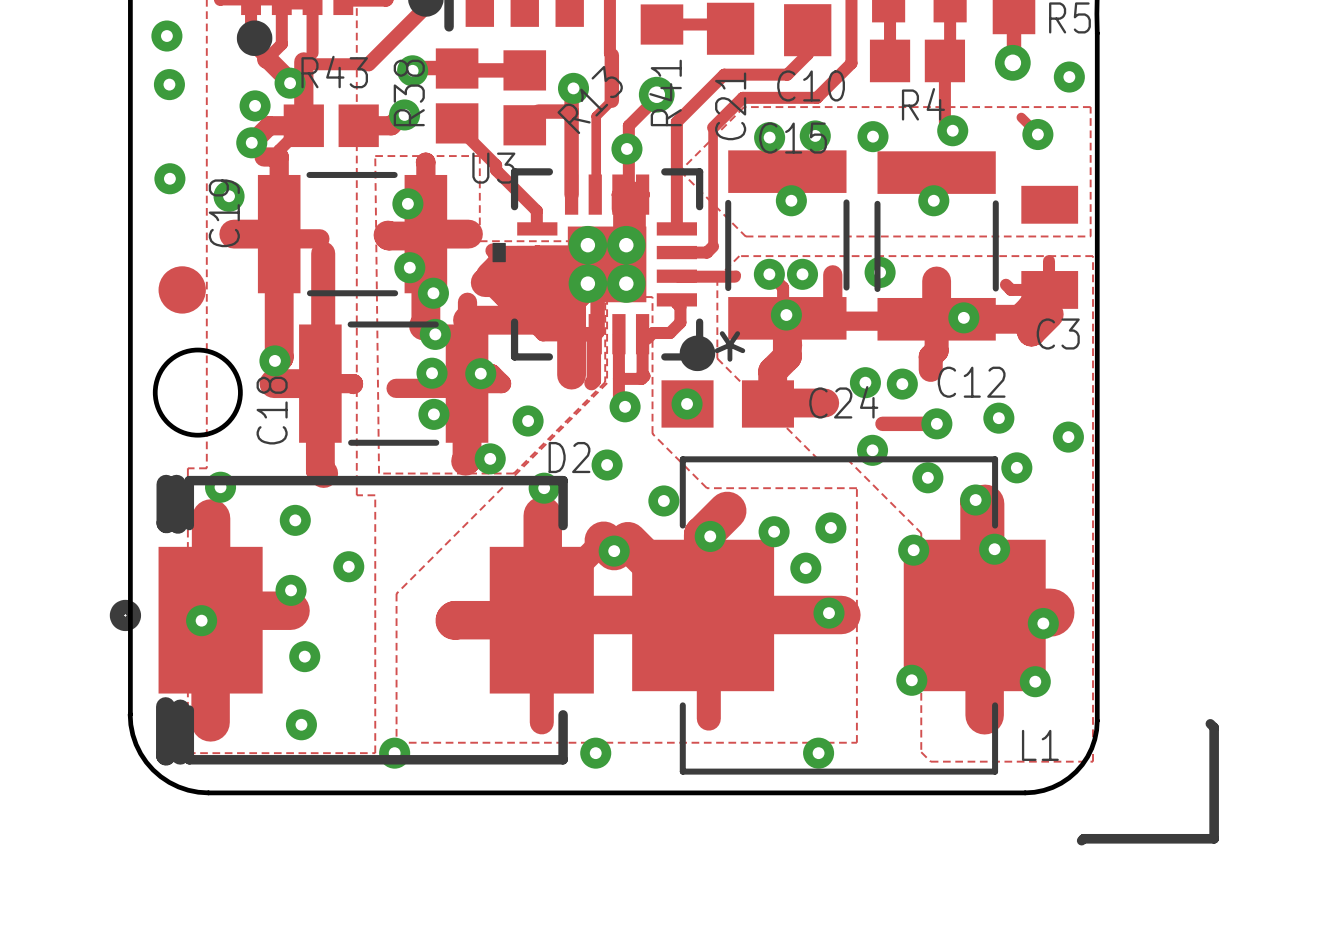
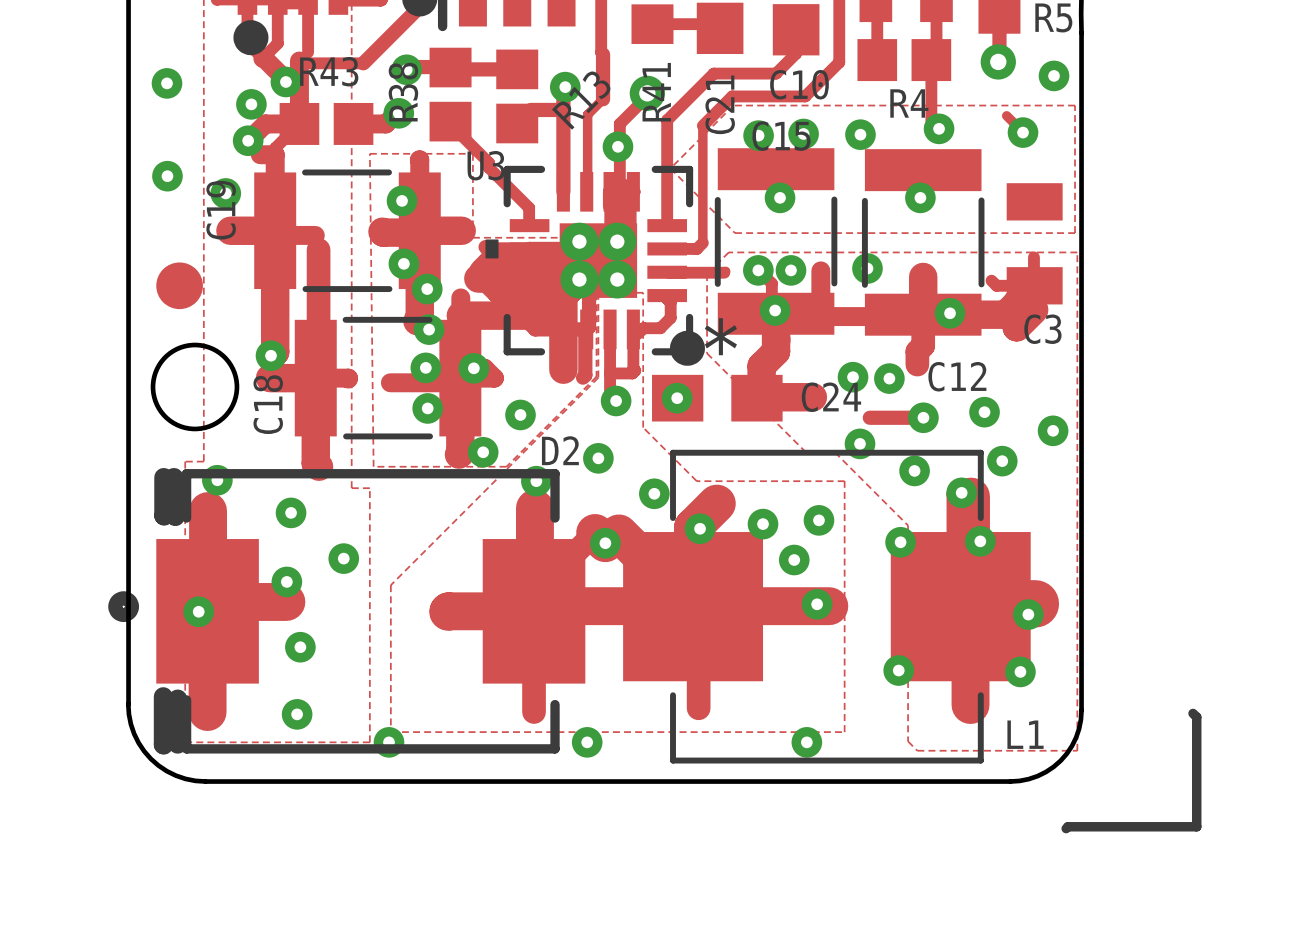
via: (166, 36) -> none

